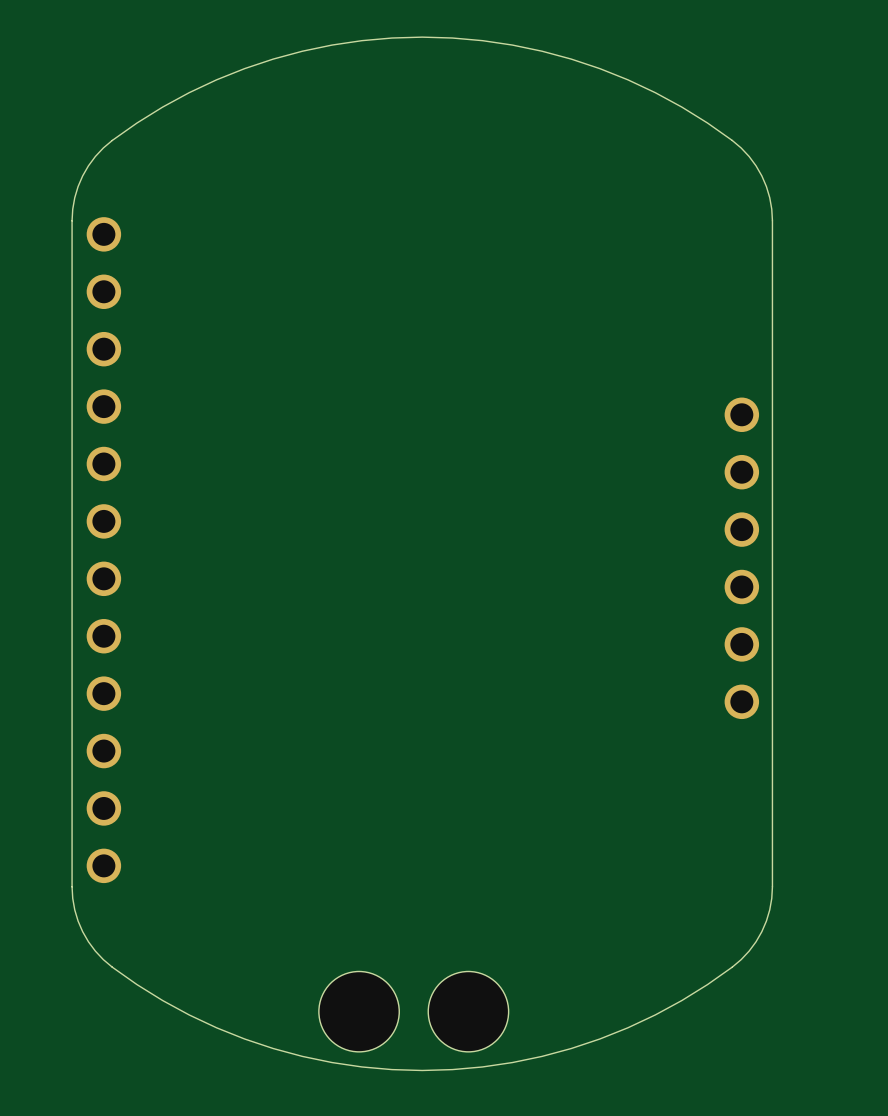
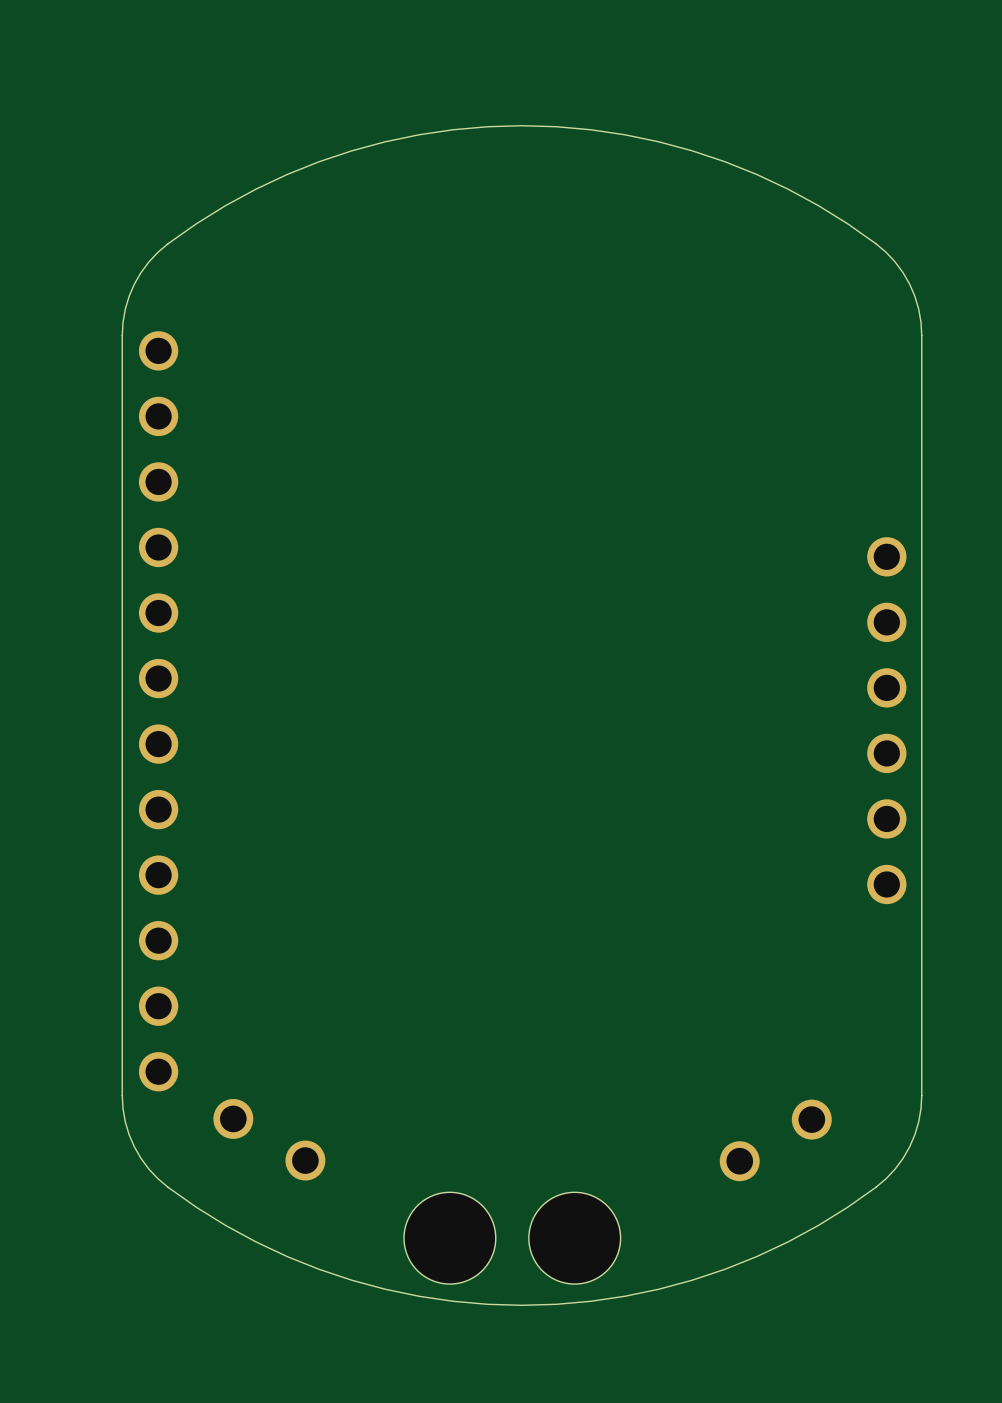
part: none -> (269, 1139)
part: none -> (775, 1140)

